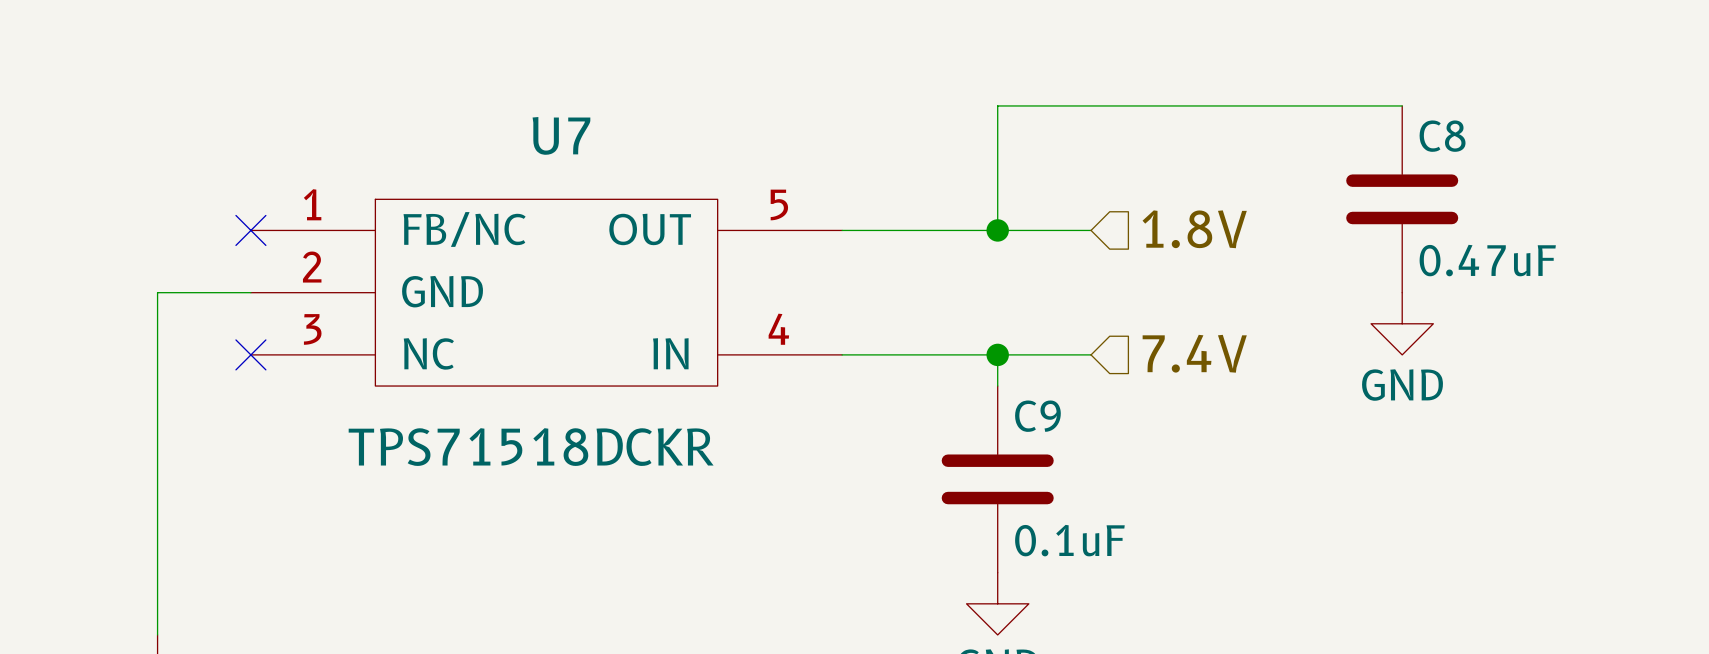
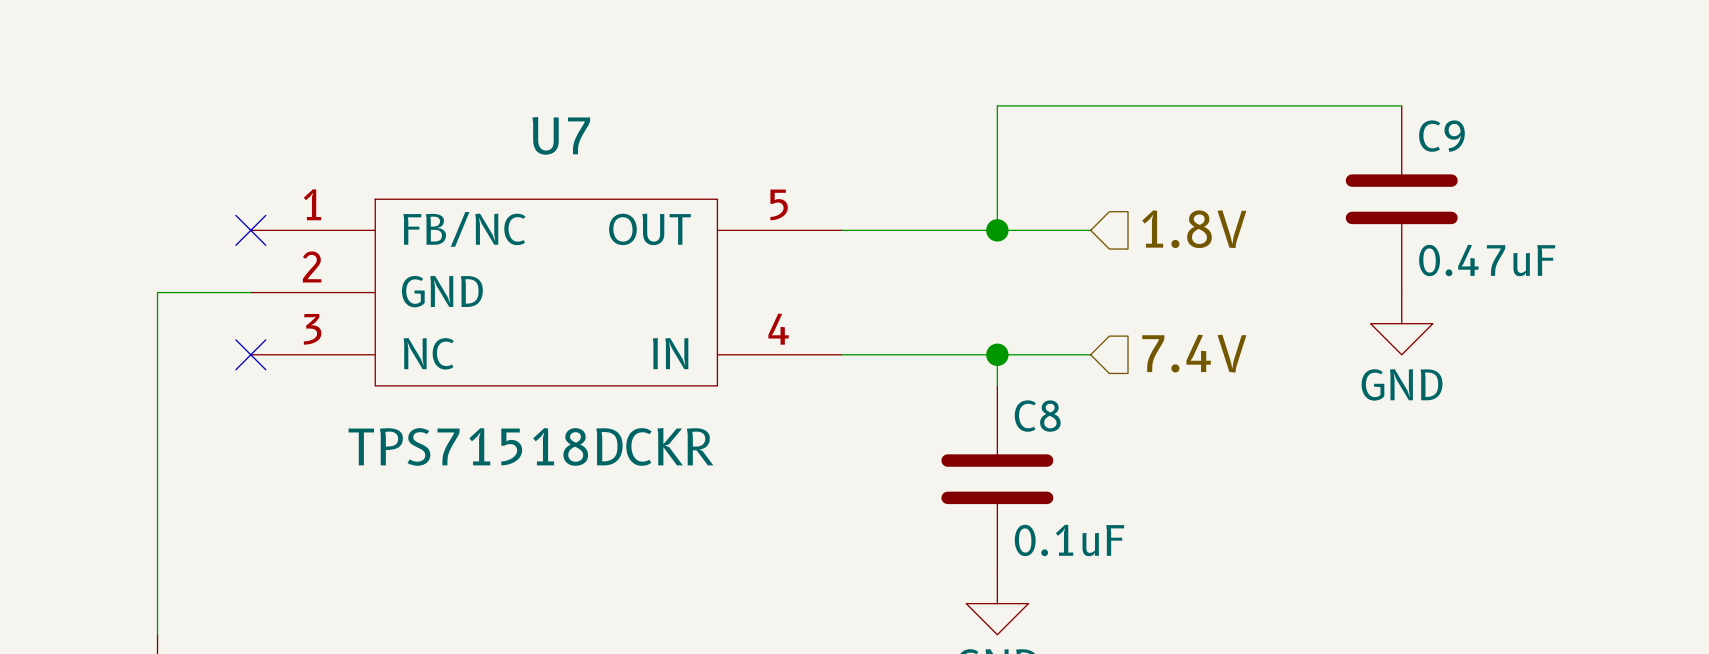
C8 name: C8 (1442, 136) -> C9 (1441, 136)
C9 name: C9 (1037, 416) -> C8 (1037, 416)

